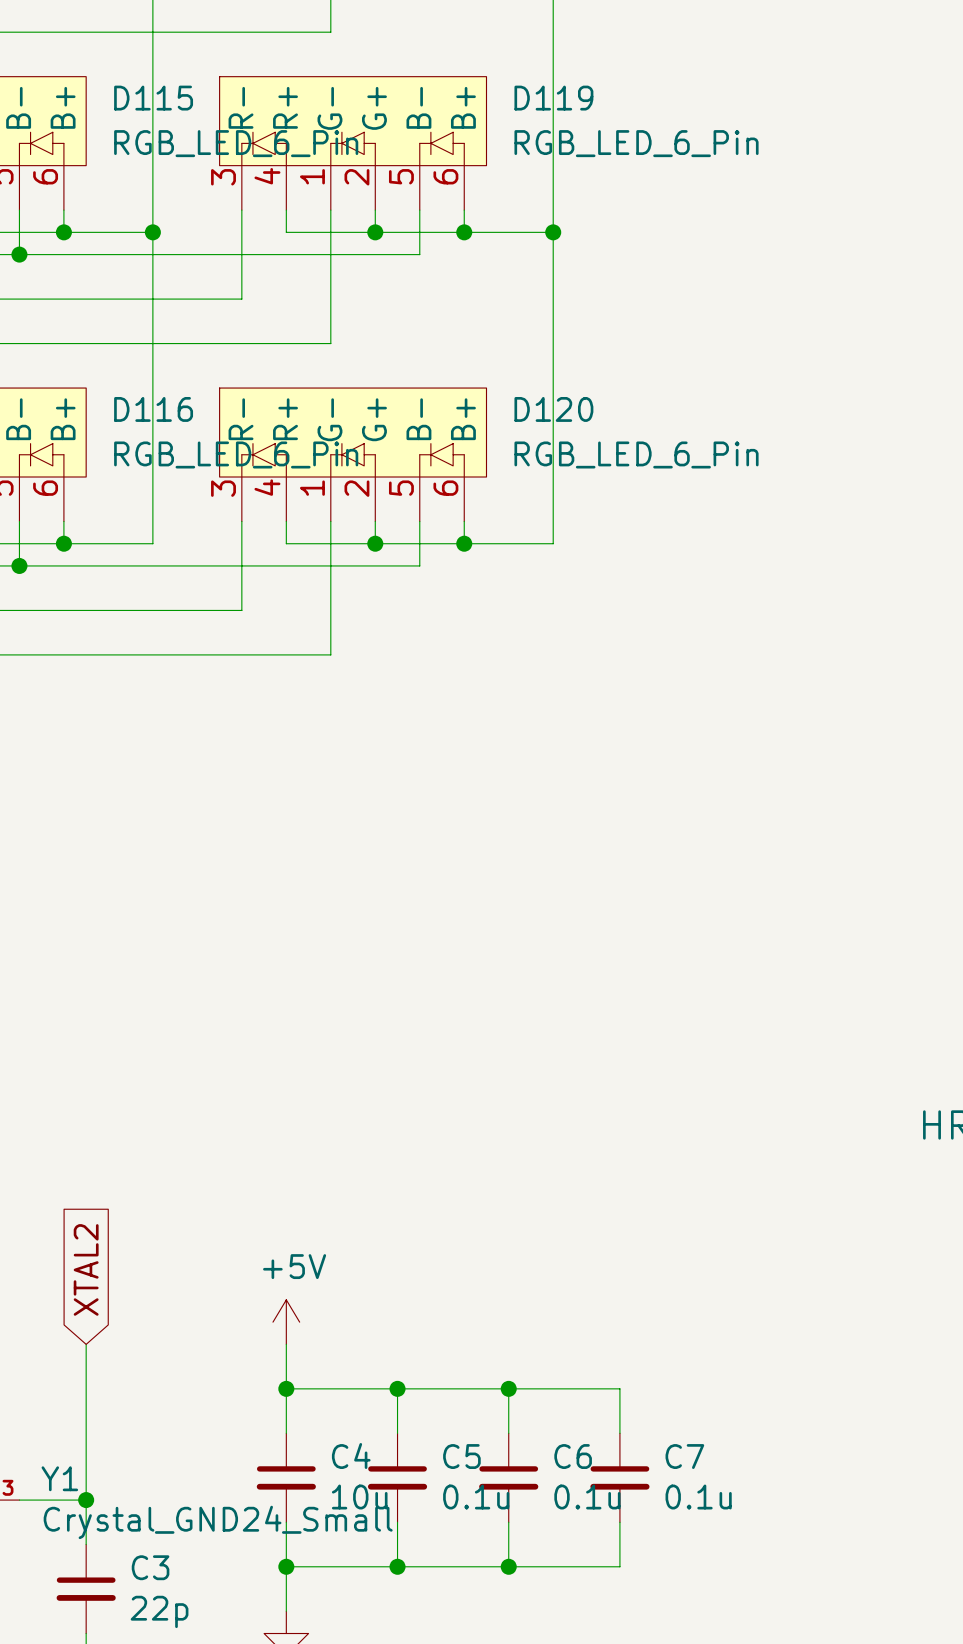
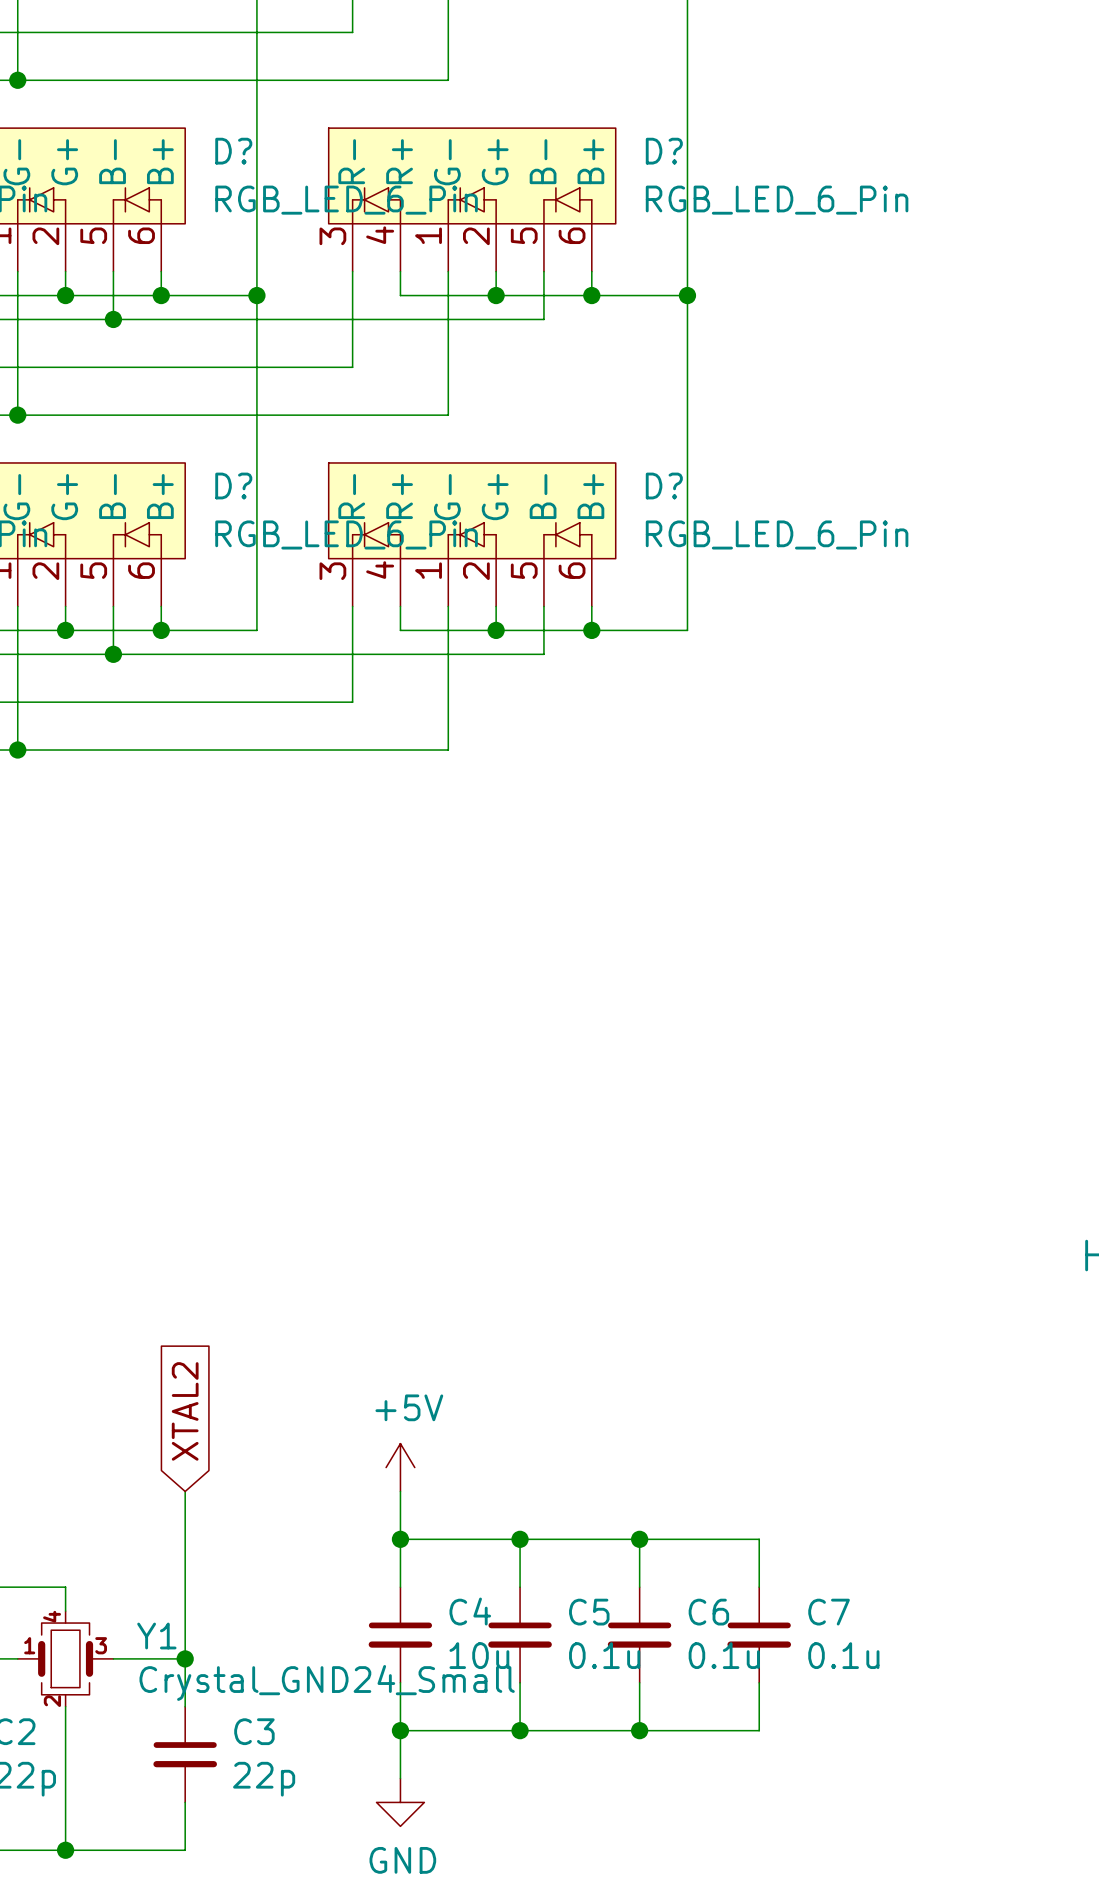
D115 name: D115 (153, 98) -> D? (233, 151)
D119 name: D119 (553, 98) -> D? (664, 151)
D116 name: D116 (153, 409) -> D? (233, 486)
D120 name: D120 (553, 409) -> D? (664, 486)

